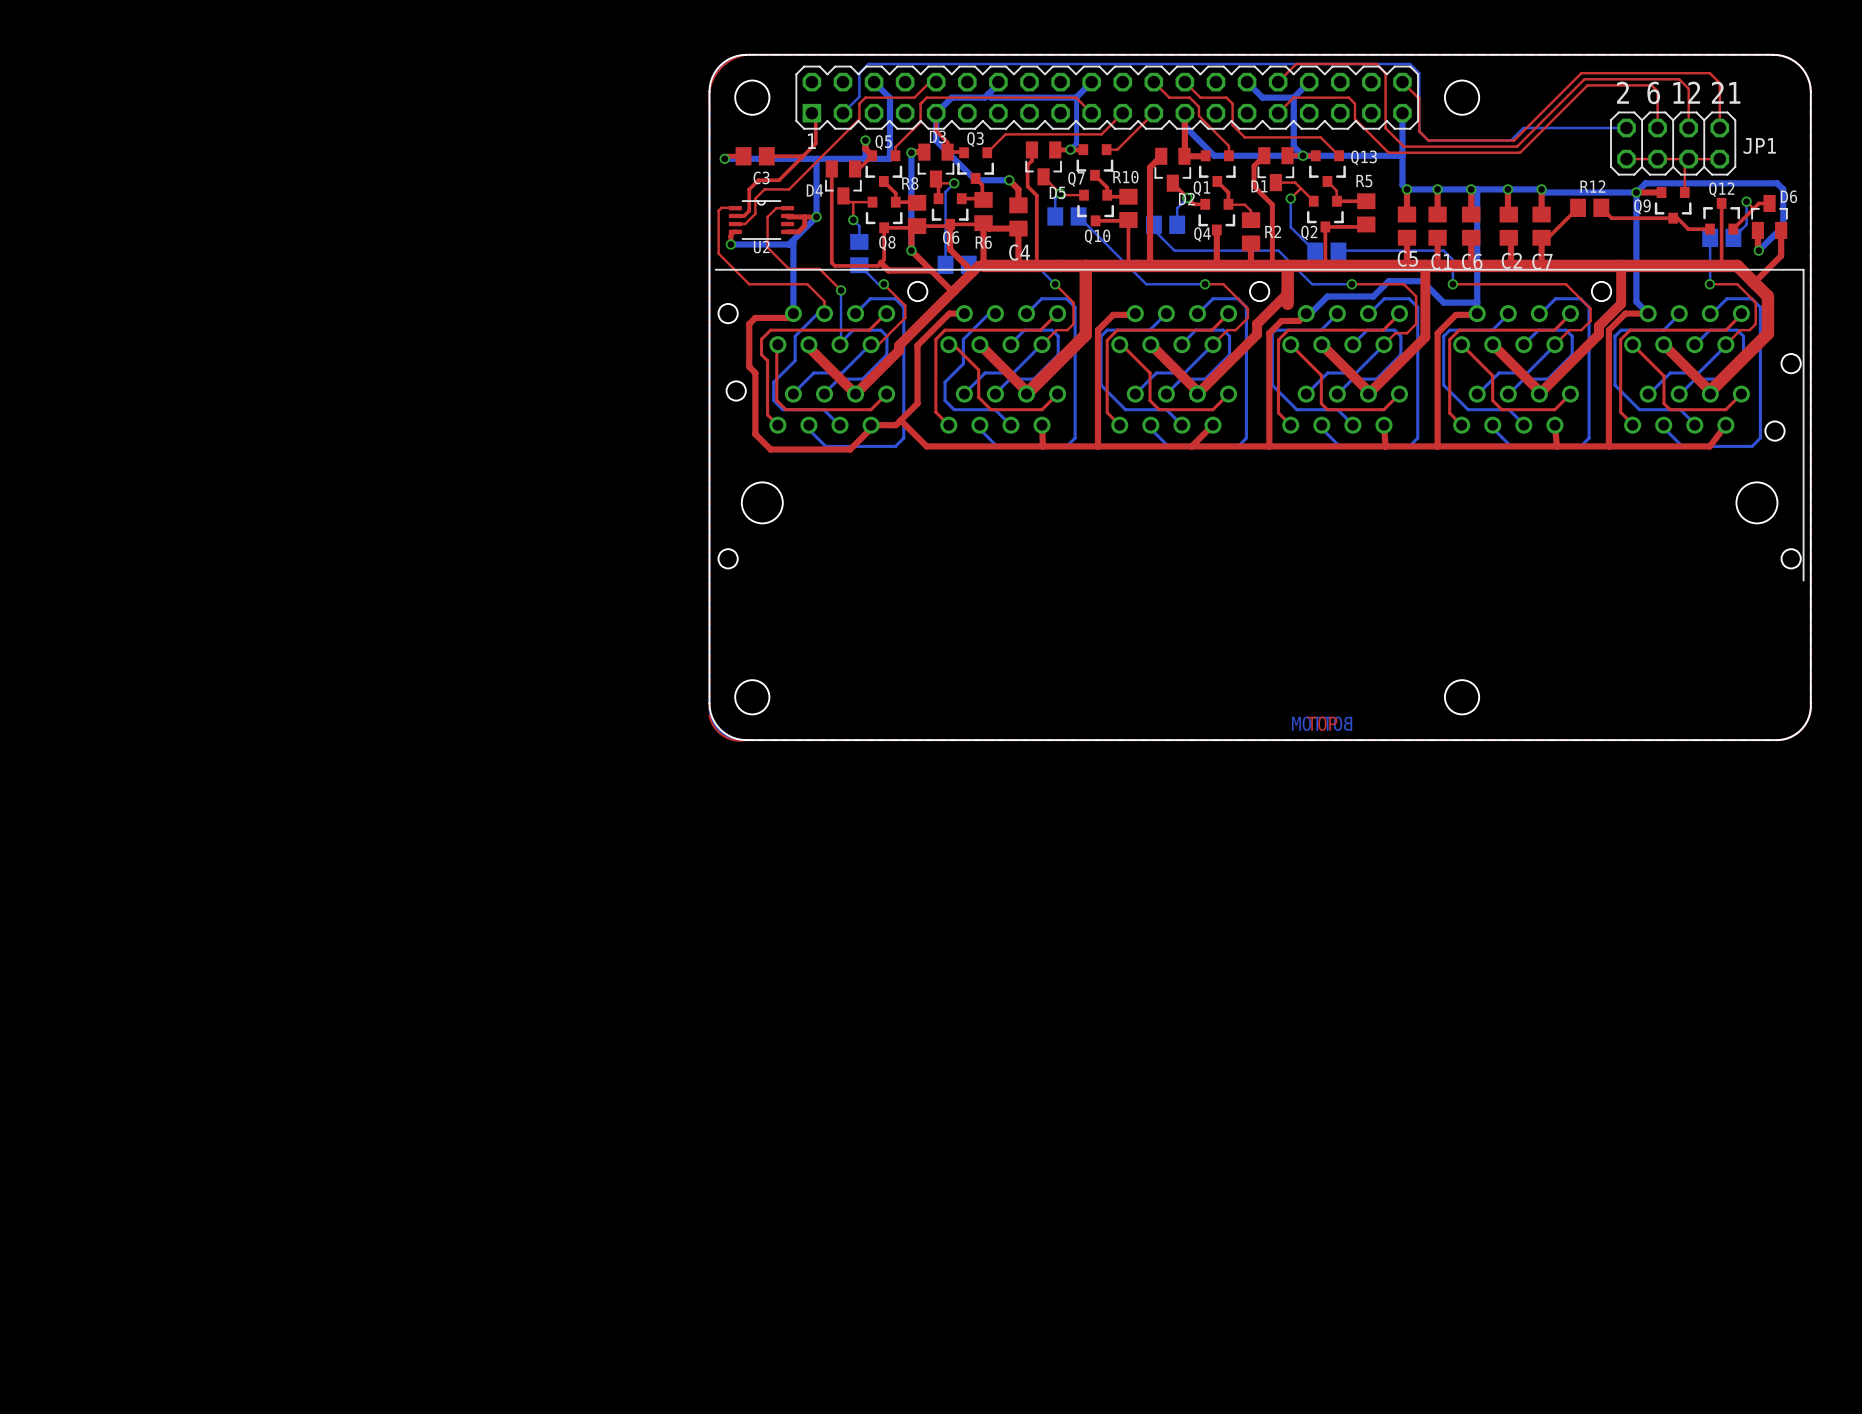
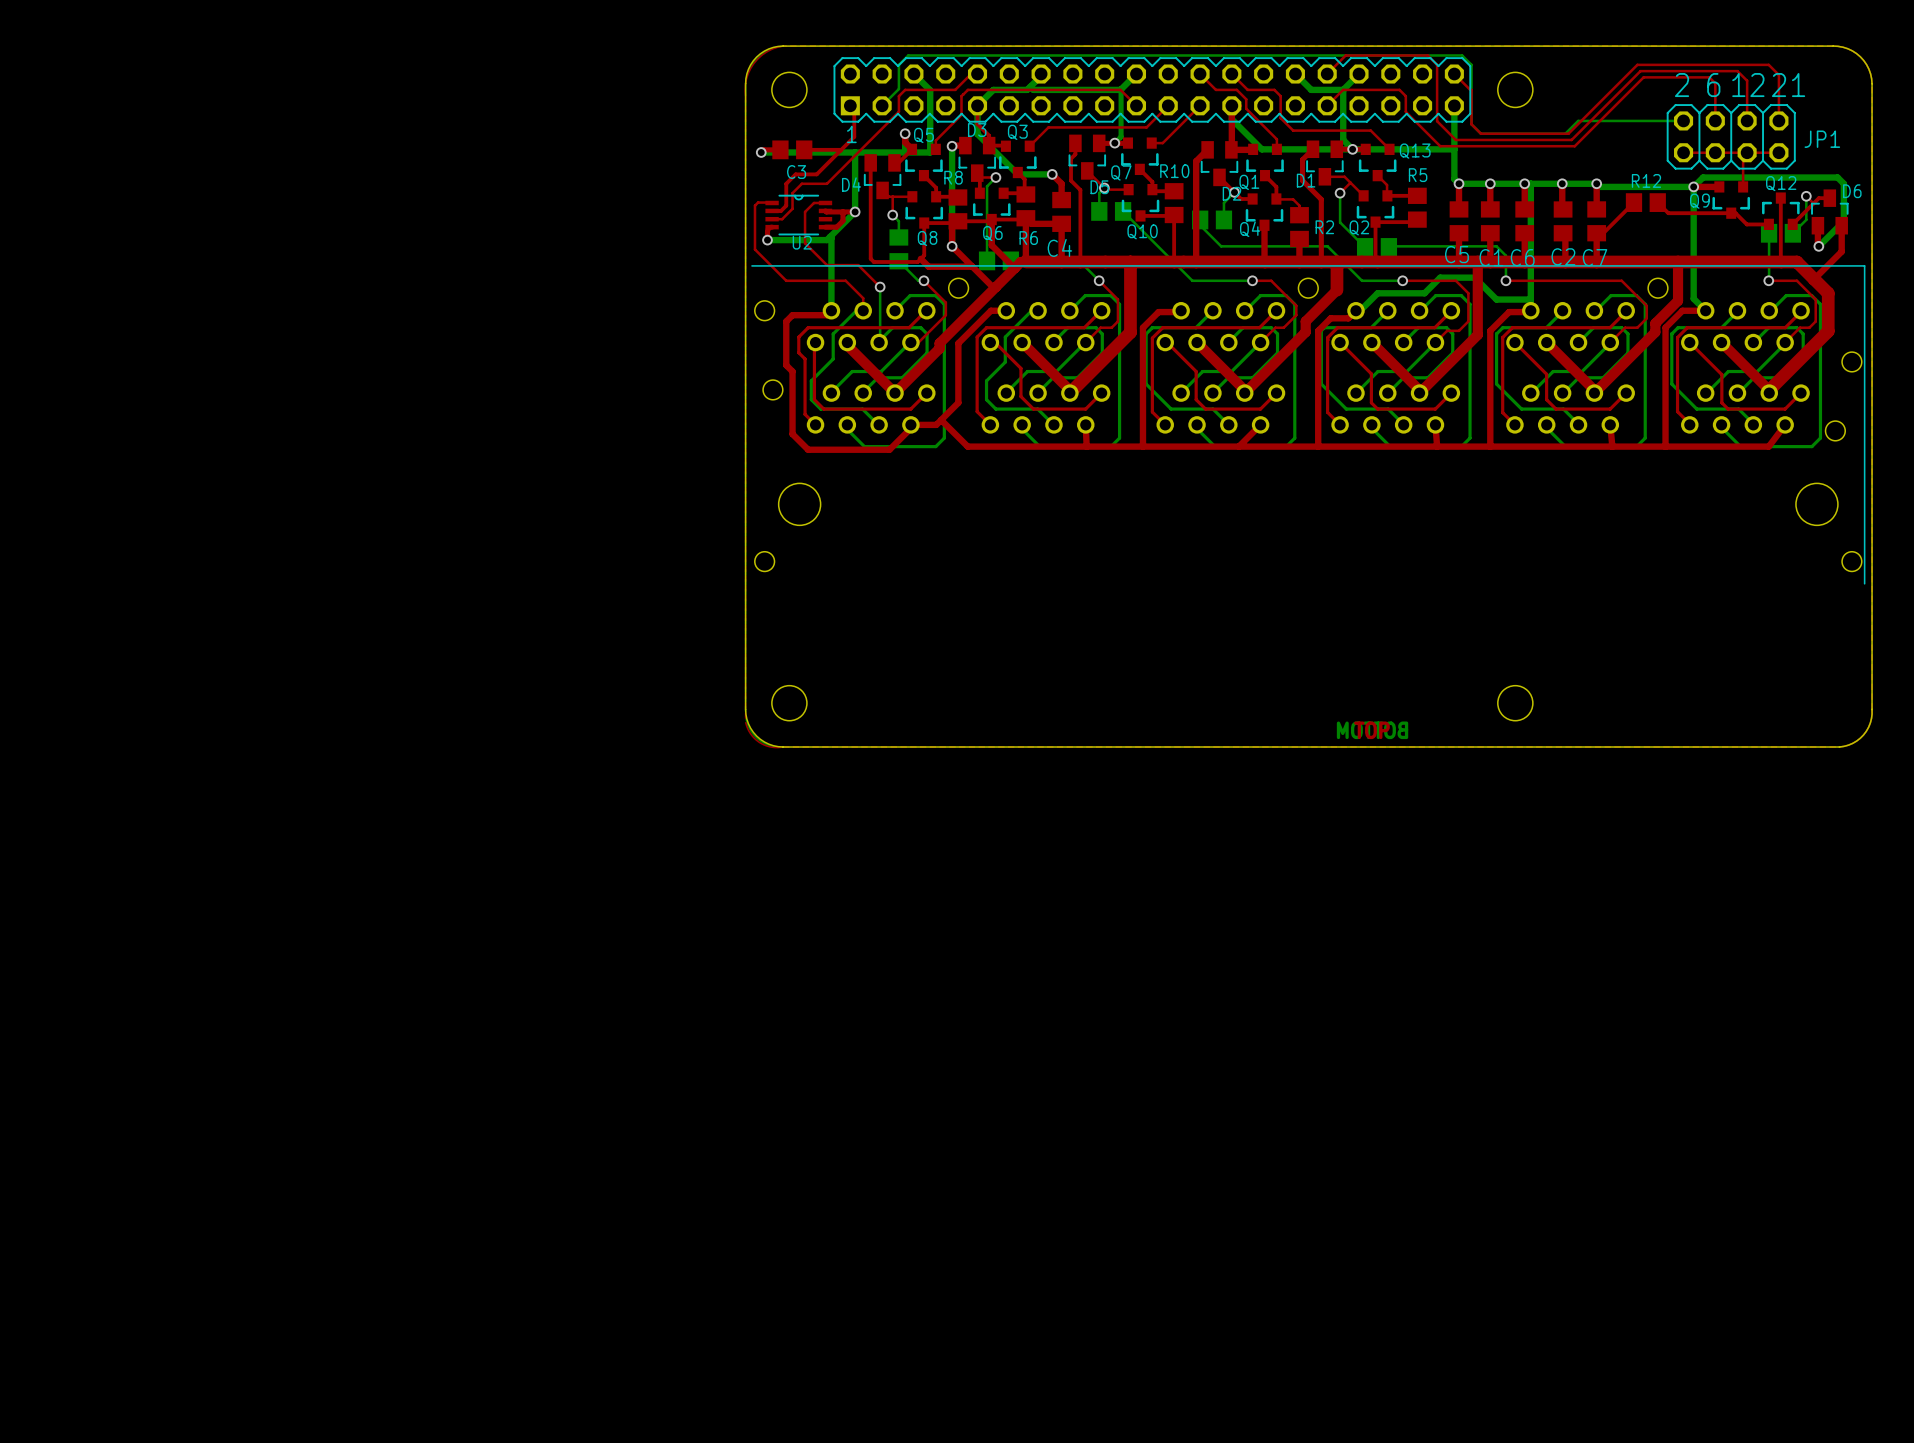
top track: (1287, 293) (1287, 303) -> none

